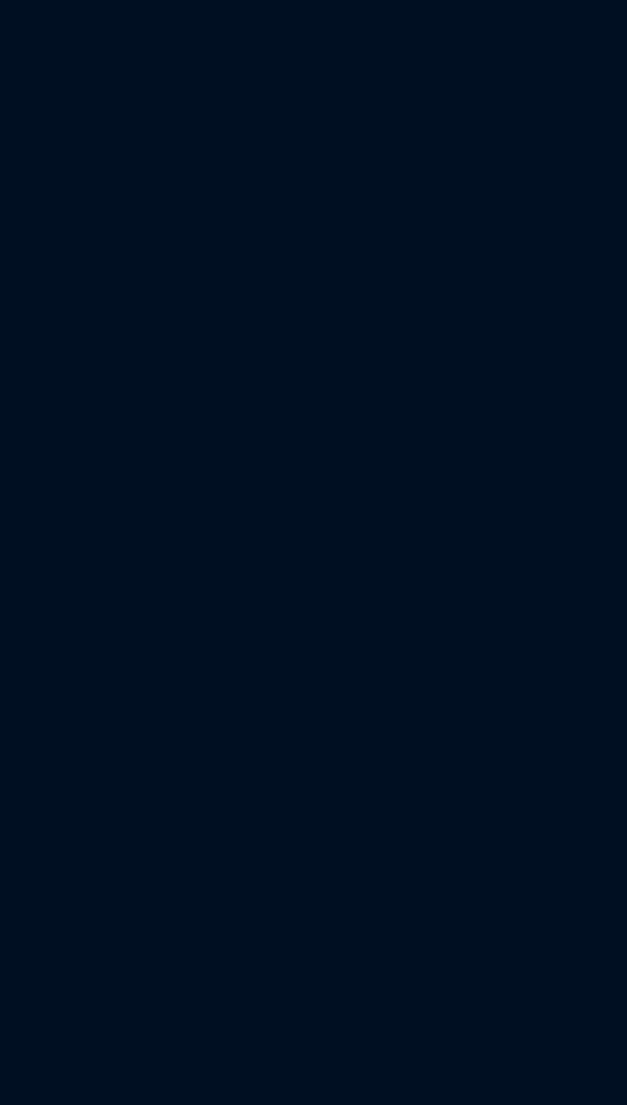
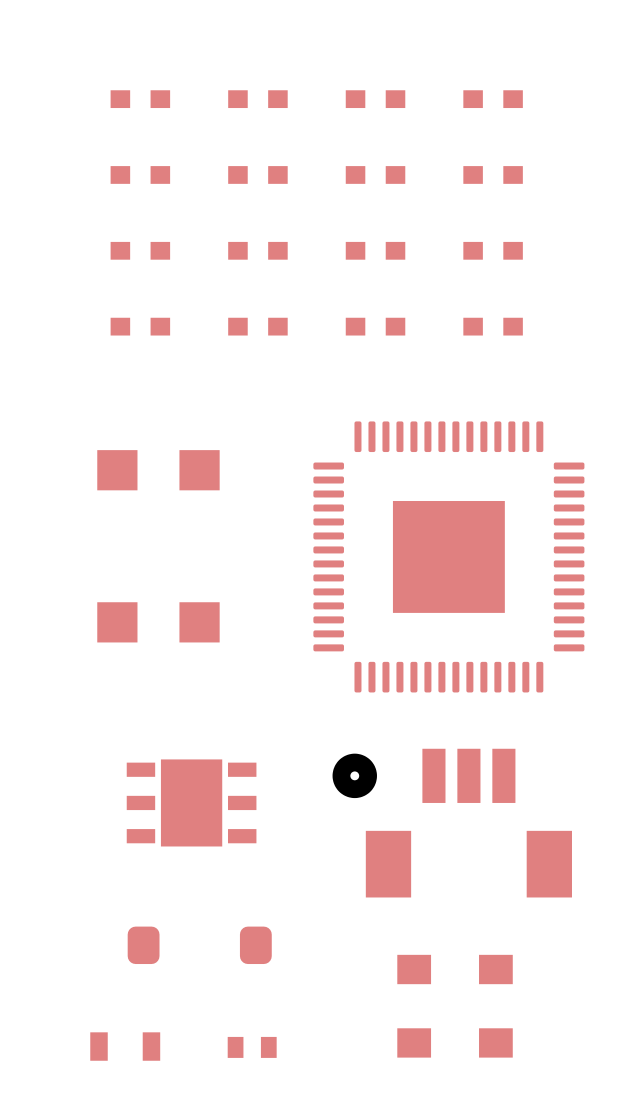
part: none -> (140, 99)
part: none -> (257, 99)
part: none -> (375, 99)
part: none -> (493, 99)
part: none -> (140, 174)
part: none -> (257, 174)
part: none -> (375, 174)
part: none -> (493, 174)
part: none -> (140, 250)
part: none -> (257, 250)
part: none -> (375, 250)
part: none -> (493, 250)
part: none -> (140, 326)
part: none -> (257, 326)
part: none -> (375, 326)
part: none -> (493, 326)
part: none -> (158, 470)
part: none -> (448, 556)
part: none -> (158, 622)
part: none -> (191, 802)
part: none -> (452, 823)
part: none -> (199, 945)
part: none -> (455, 1006)
part: none -> (125, 1046)
part: none -> (252, 1047)

